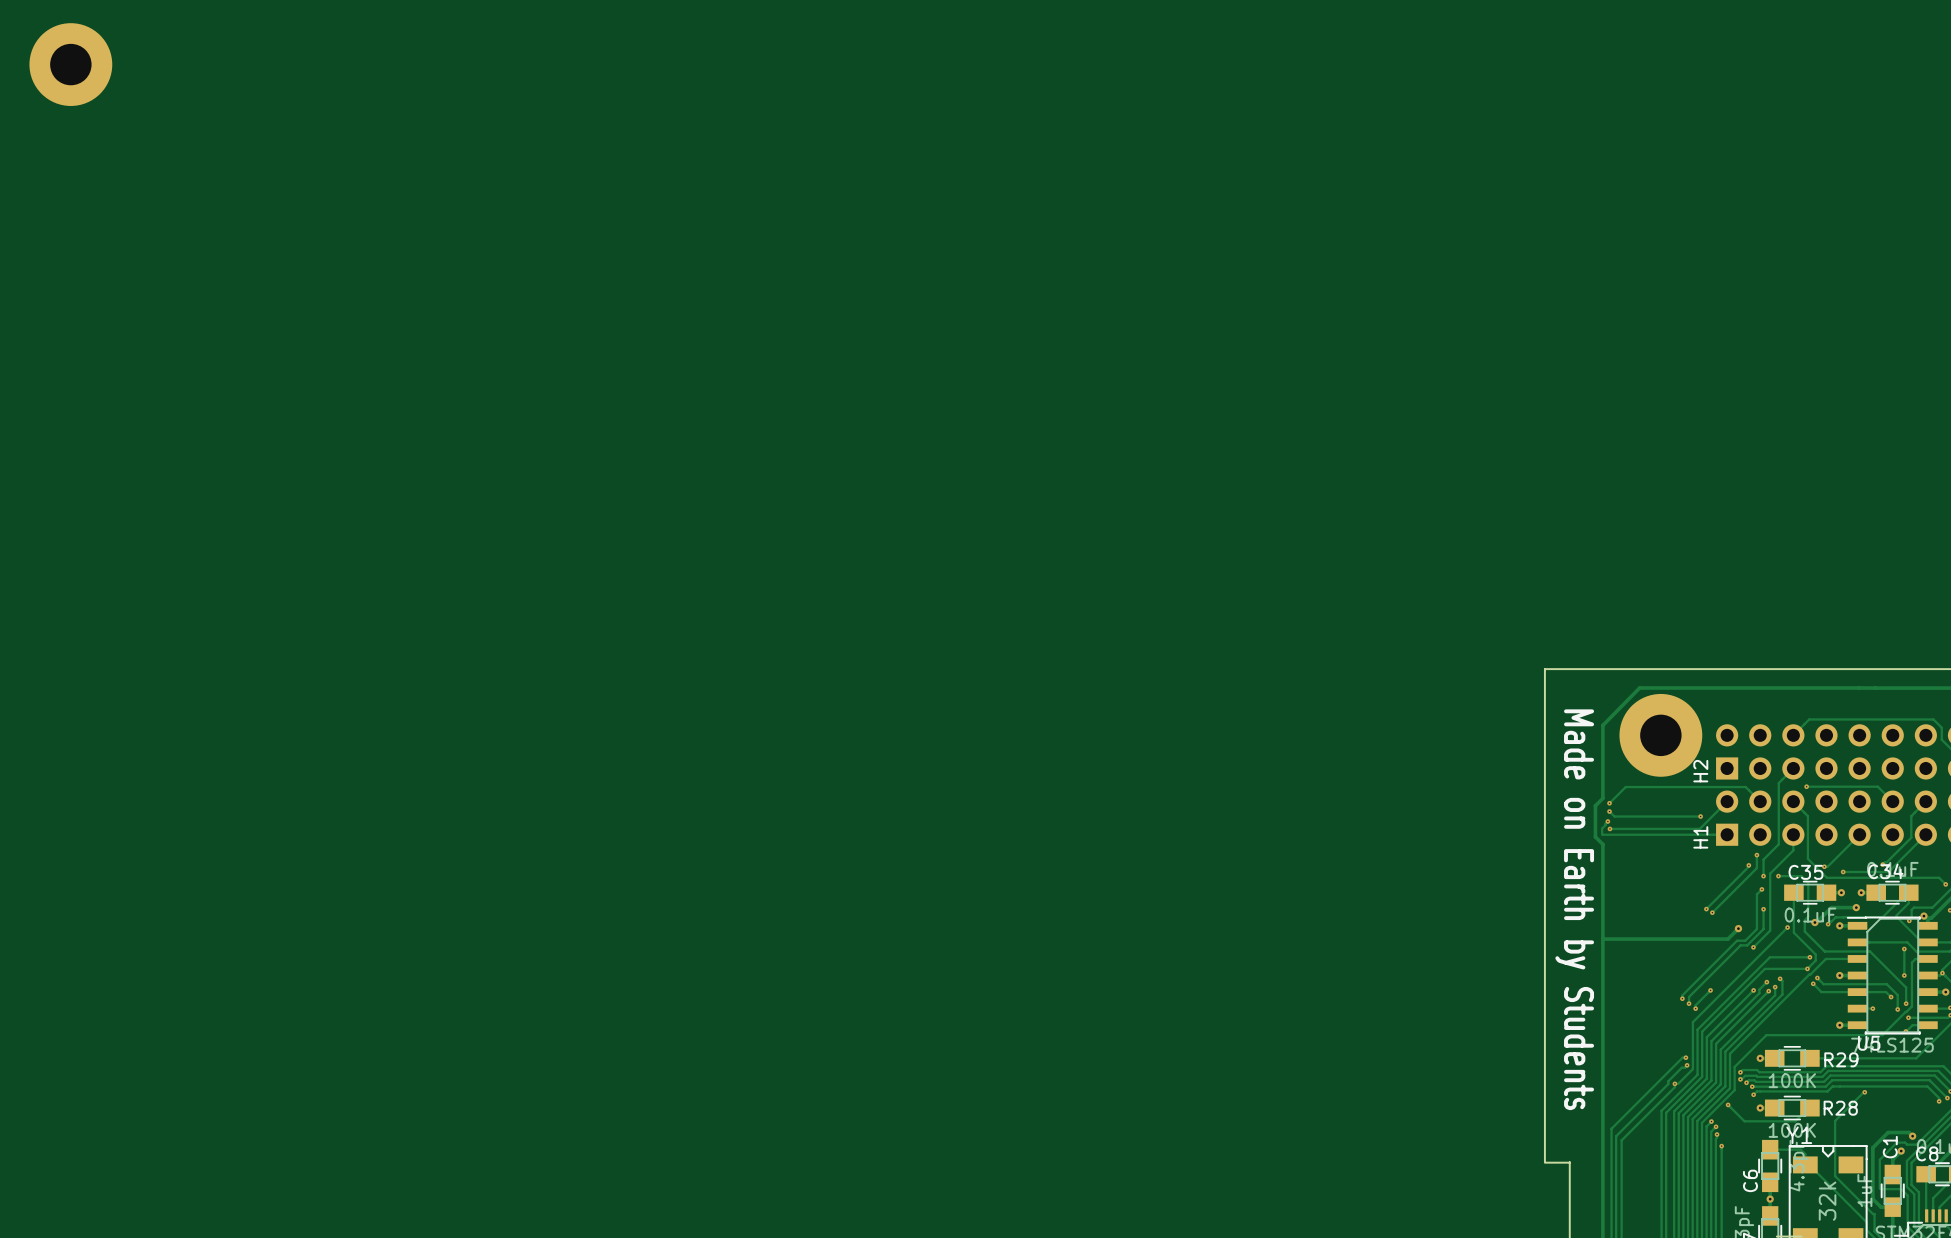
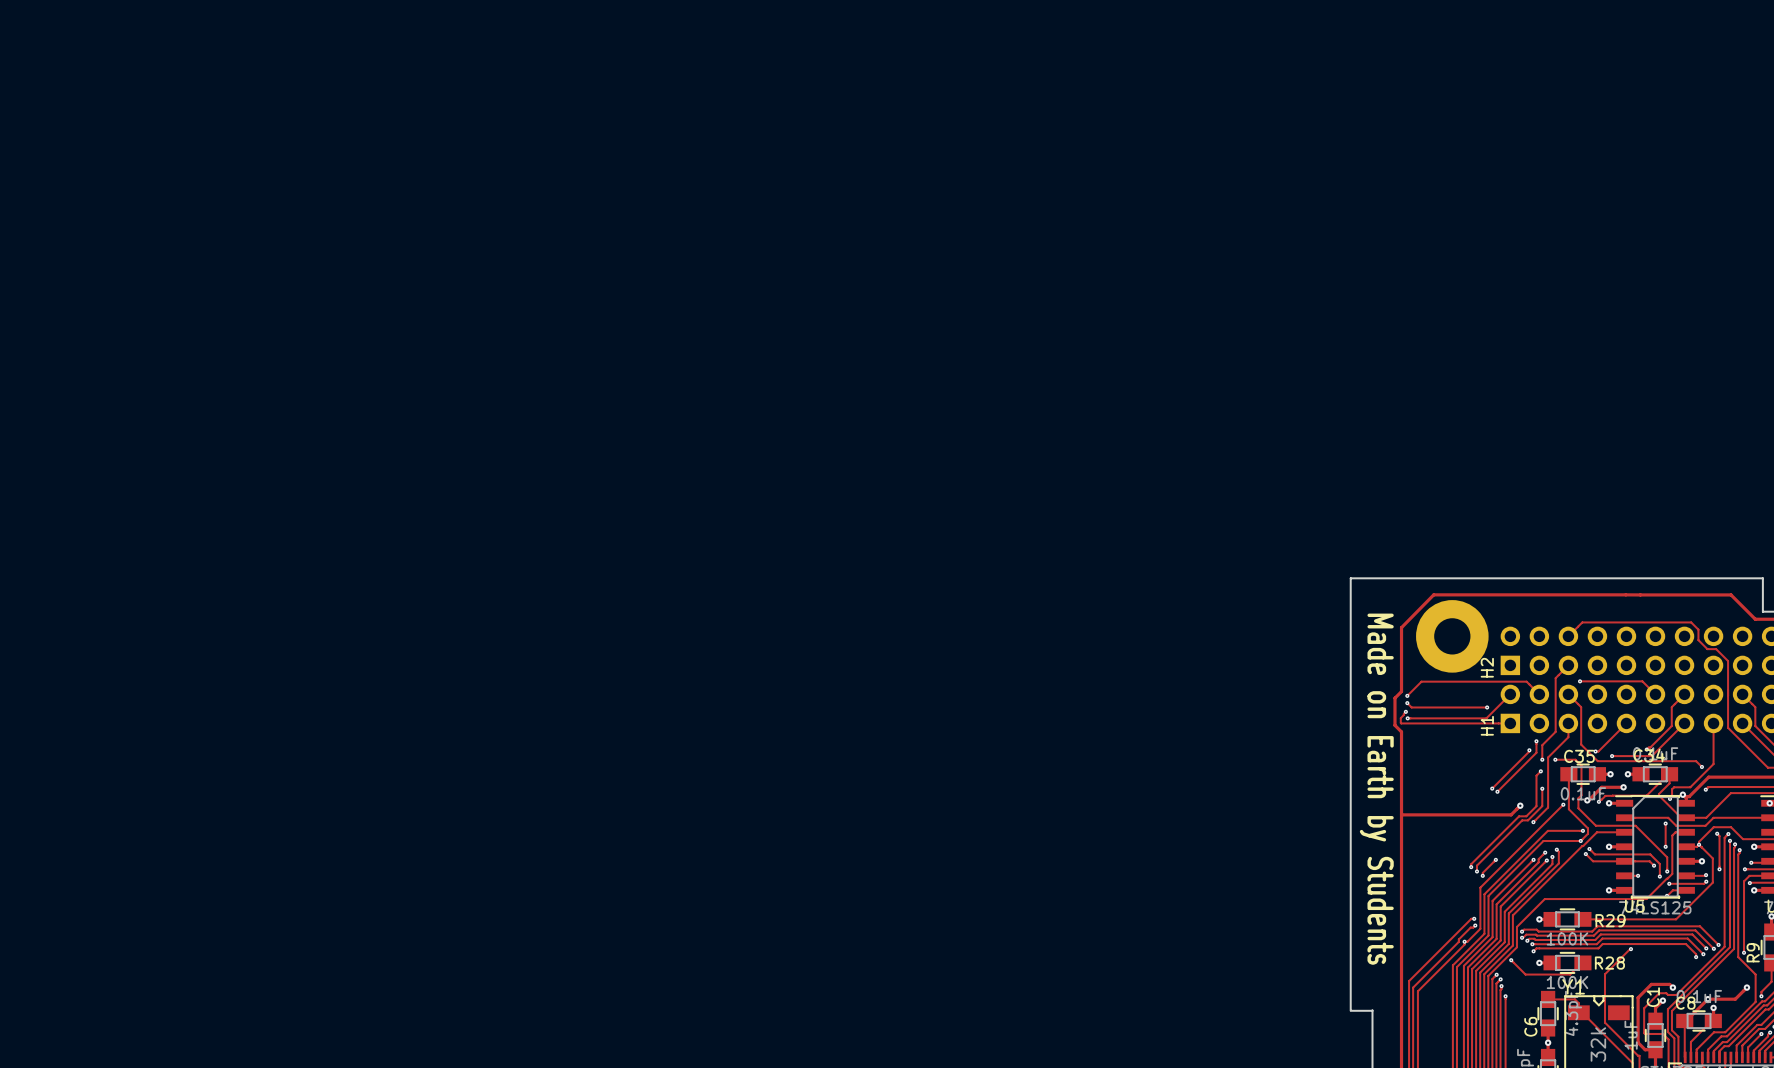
part: (70, 64) -> none

